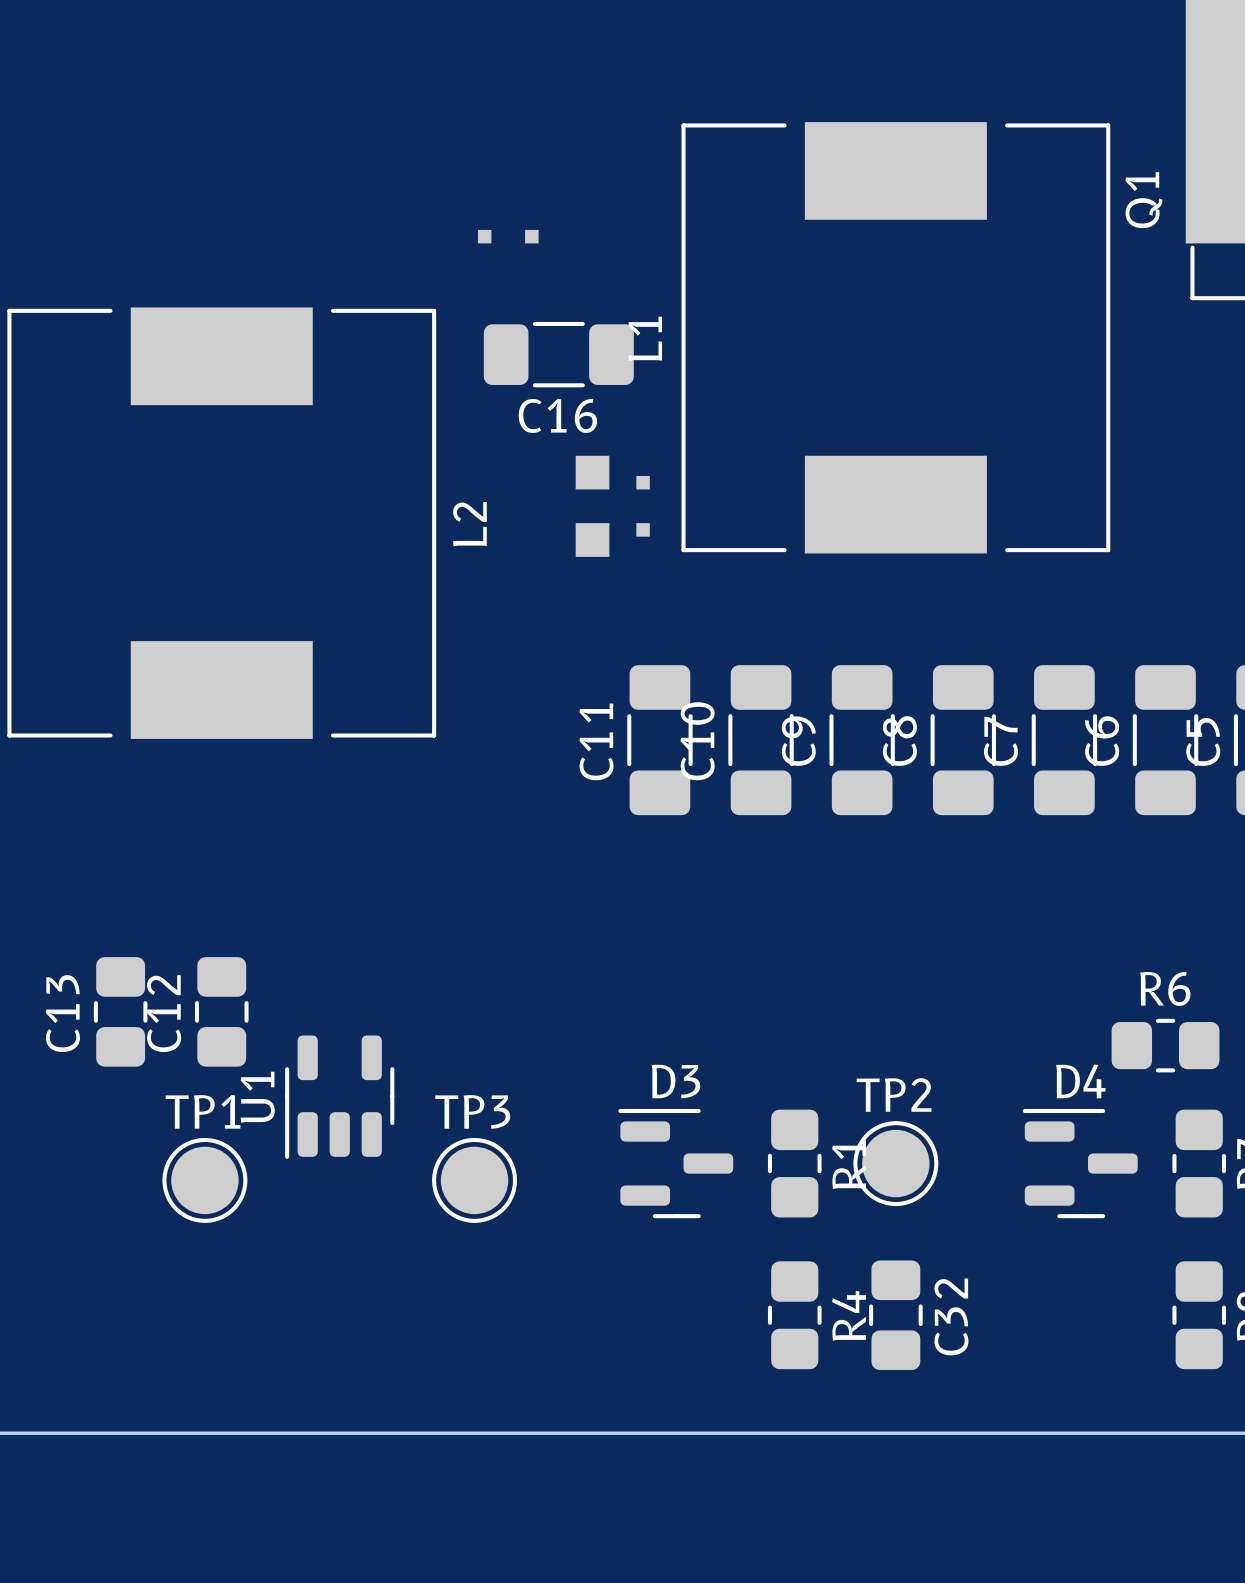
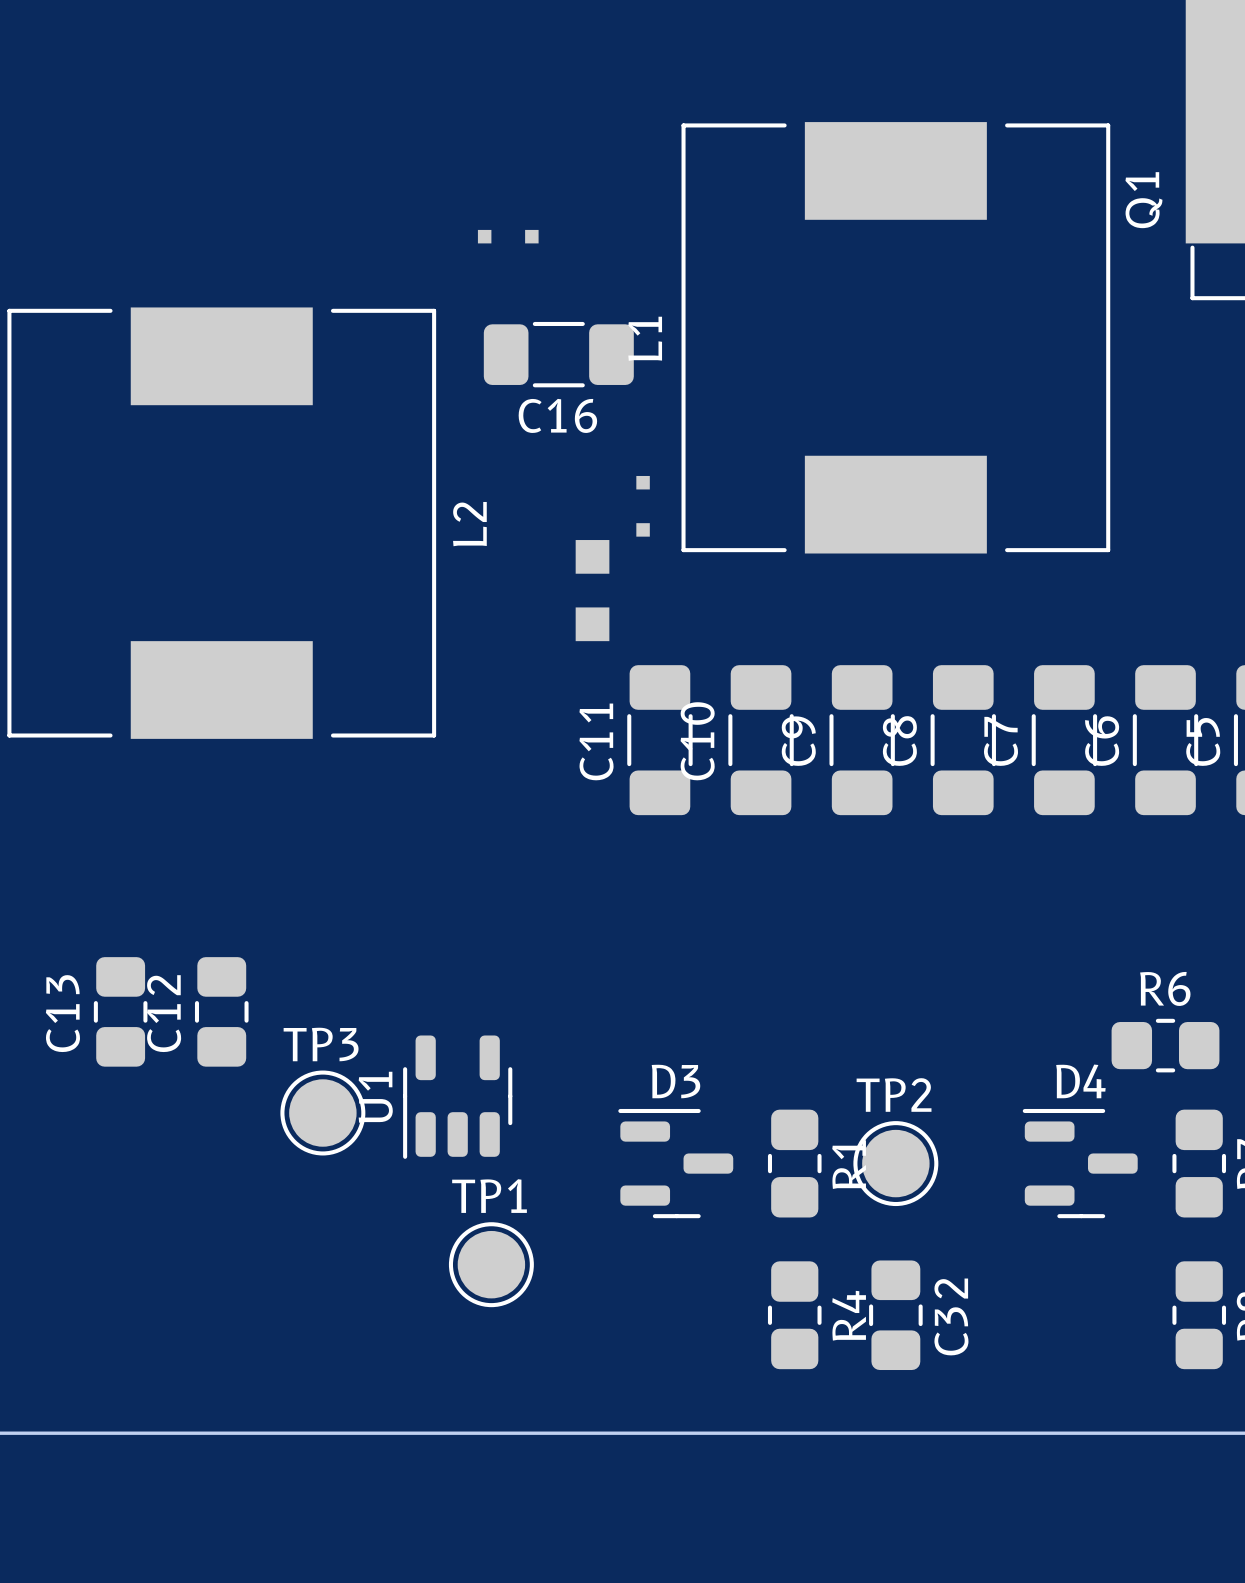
part position: (592, 506) -> (592, 590)
U1 position: (339, 1097) -> (457, 1097)
TP1 position: (204, 1180) -> (491, 1264)
TP3 position: (474, 1180) -> (322, 1113)

